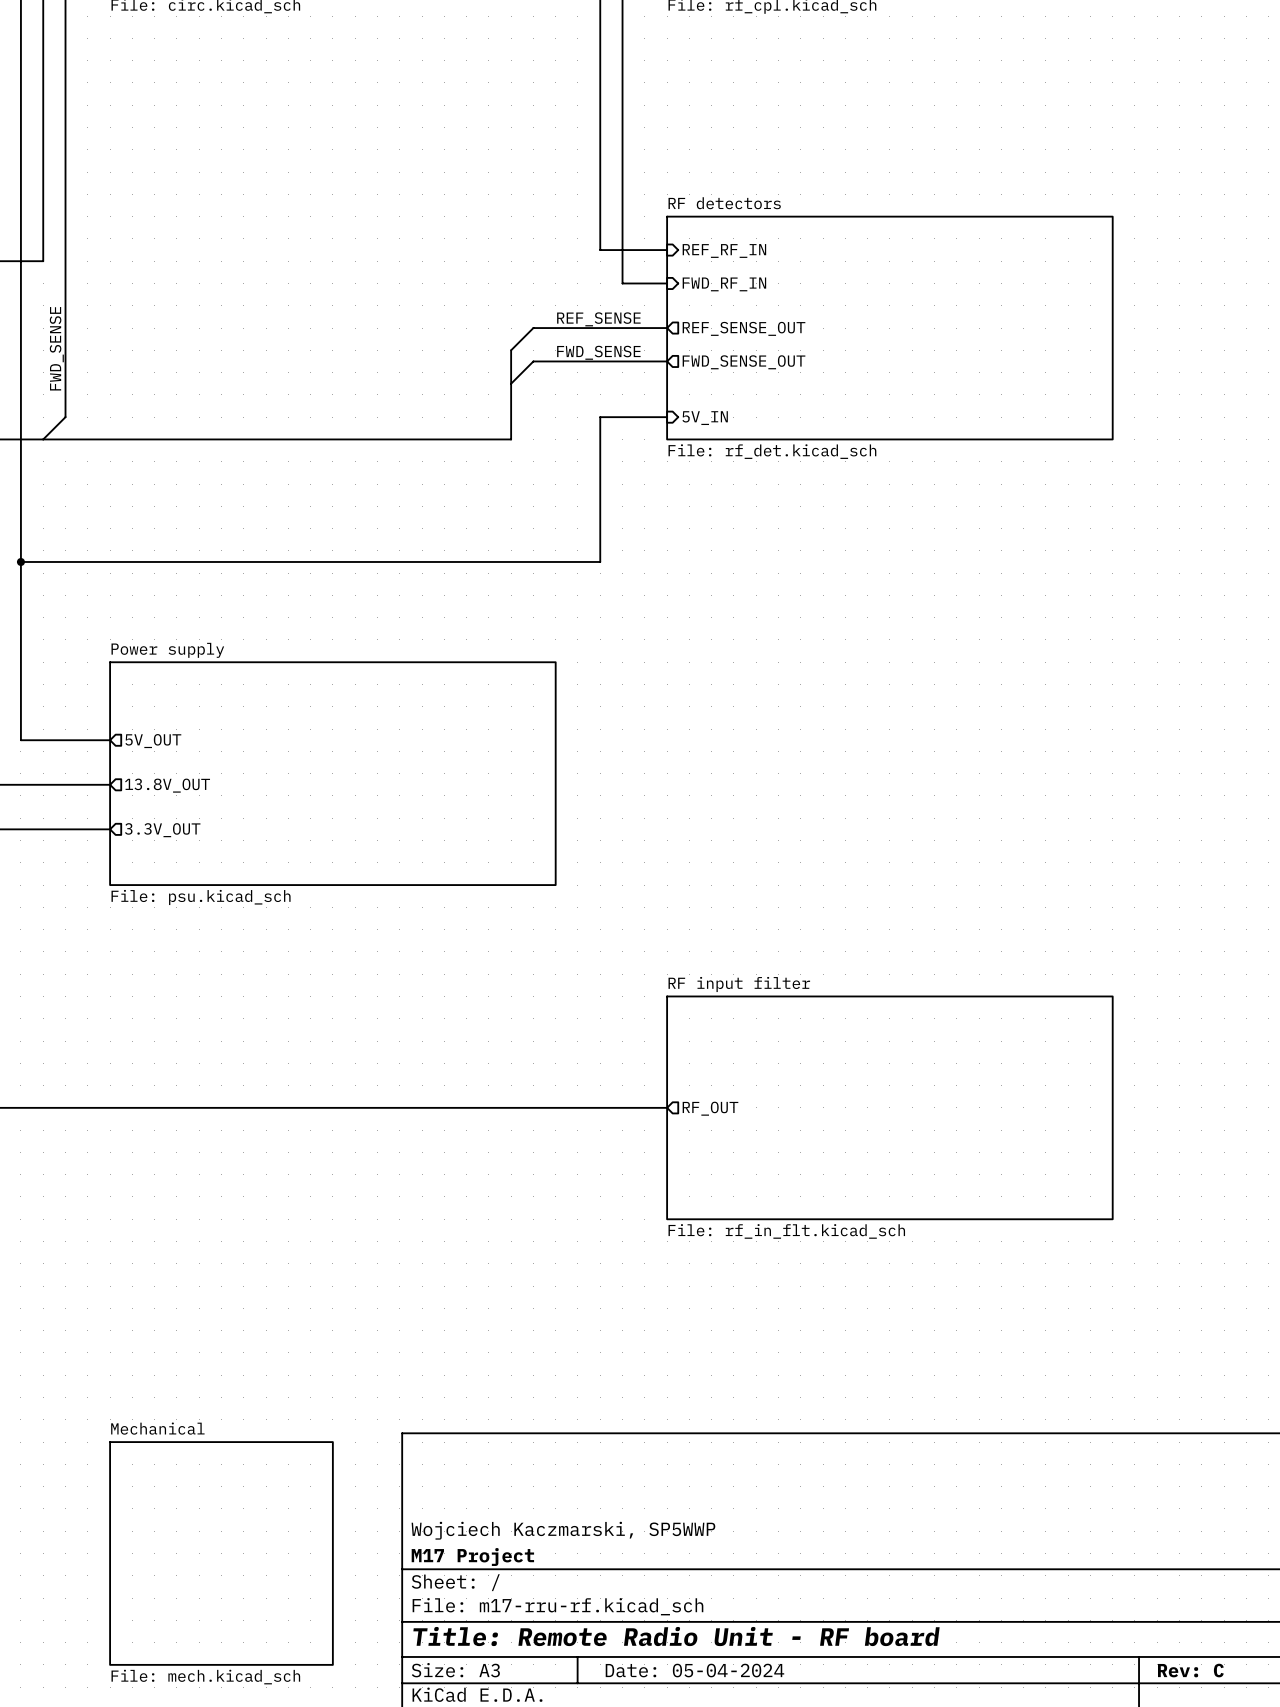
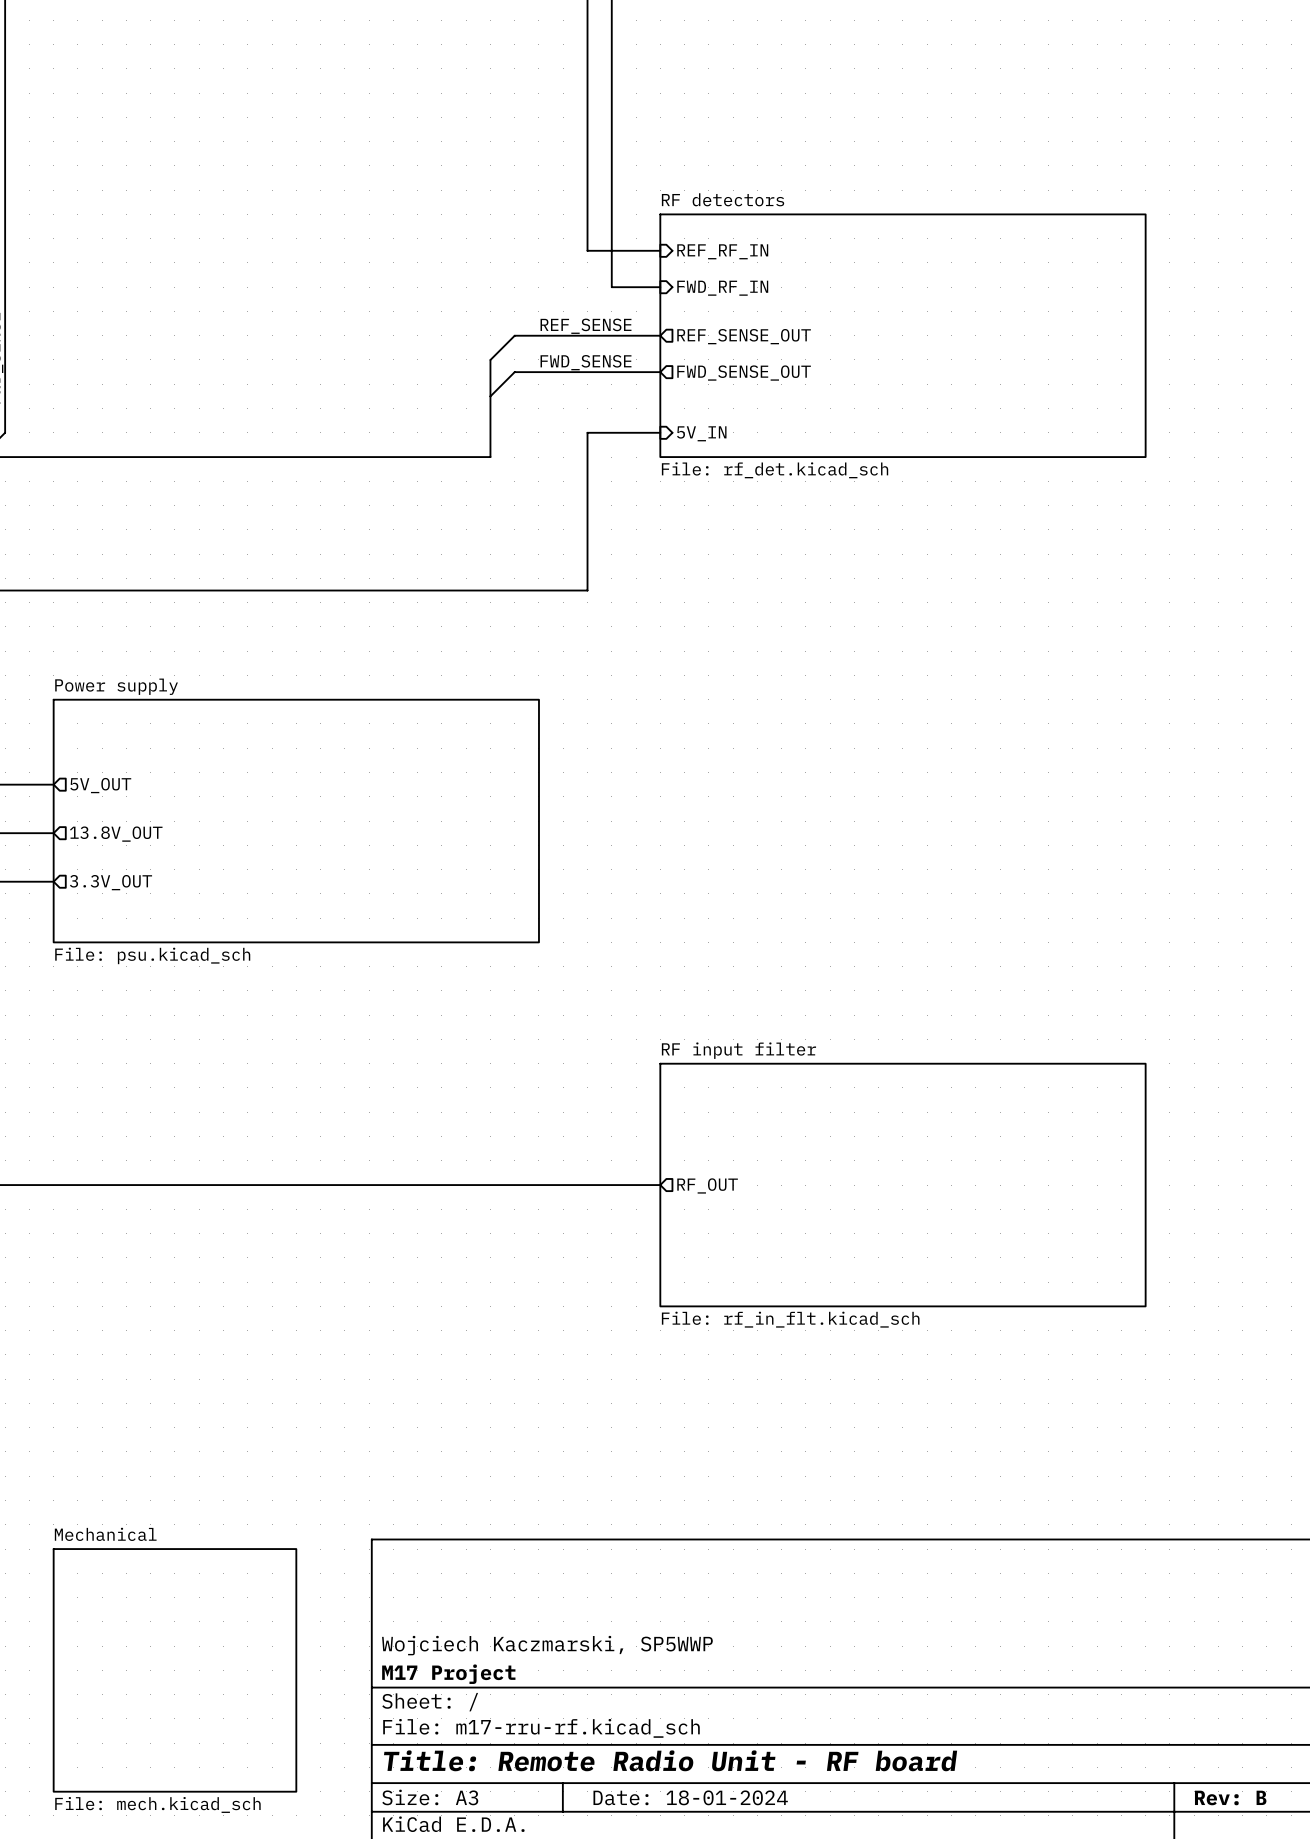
title block: Date: 05-04-2024 (694, 1670) -> Date: 18-01-2024 (690, 1797)
title block: Rev: C (1190, 1670) -> Rev: B (1230, 1797)

